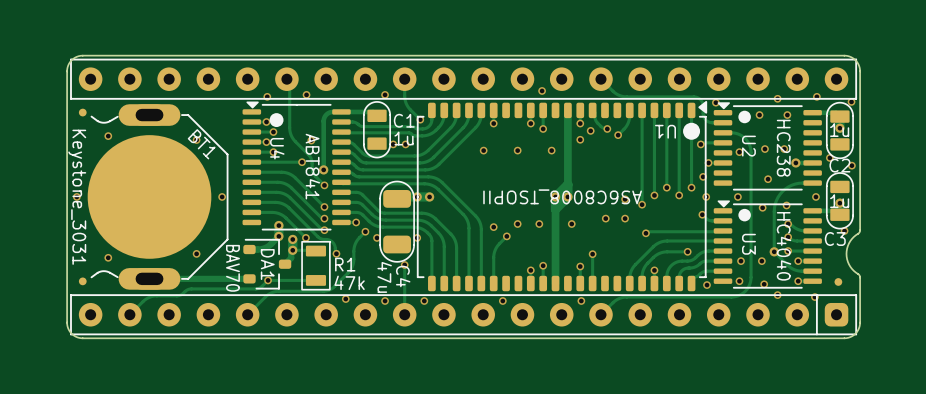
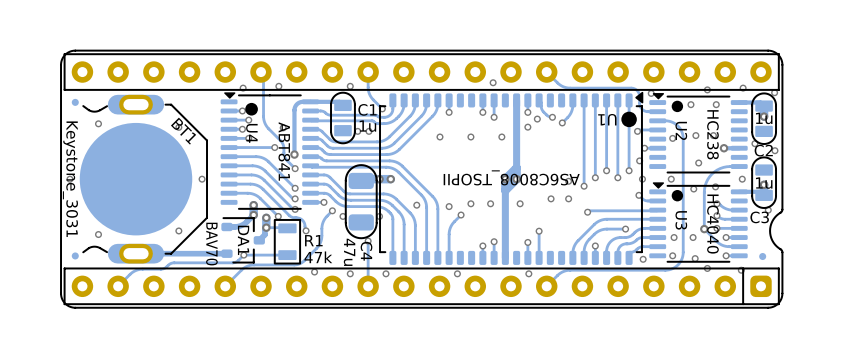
via: none -> (416, 205)

